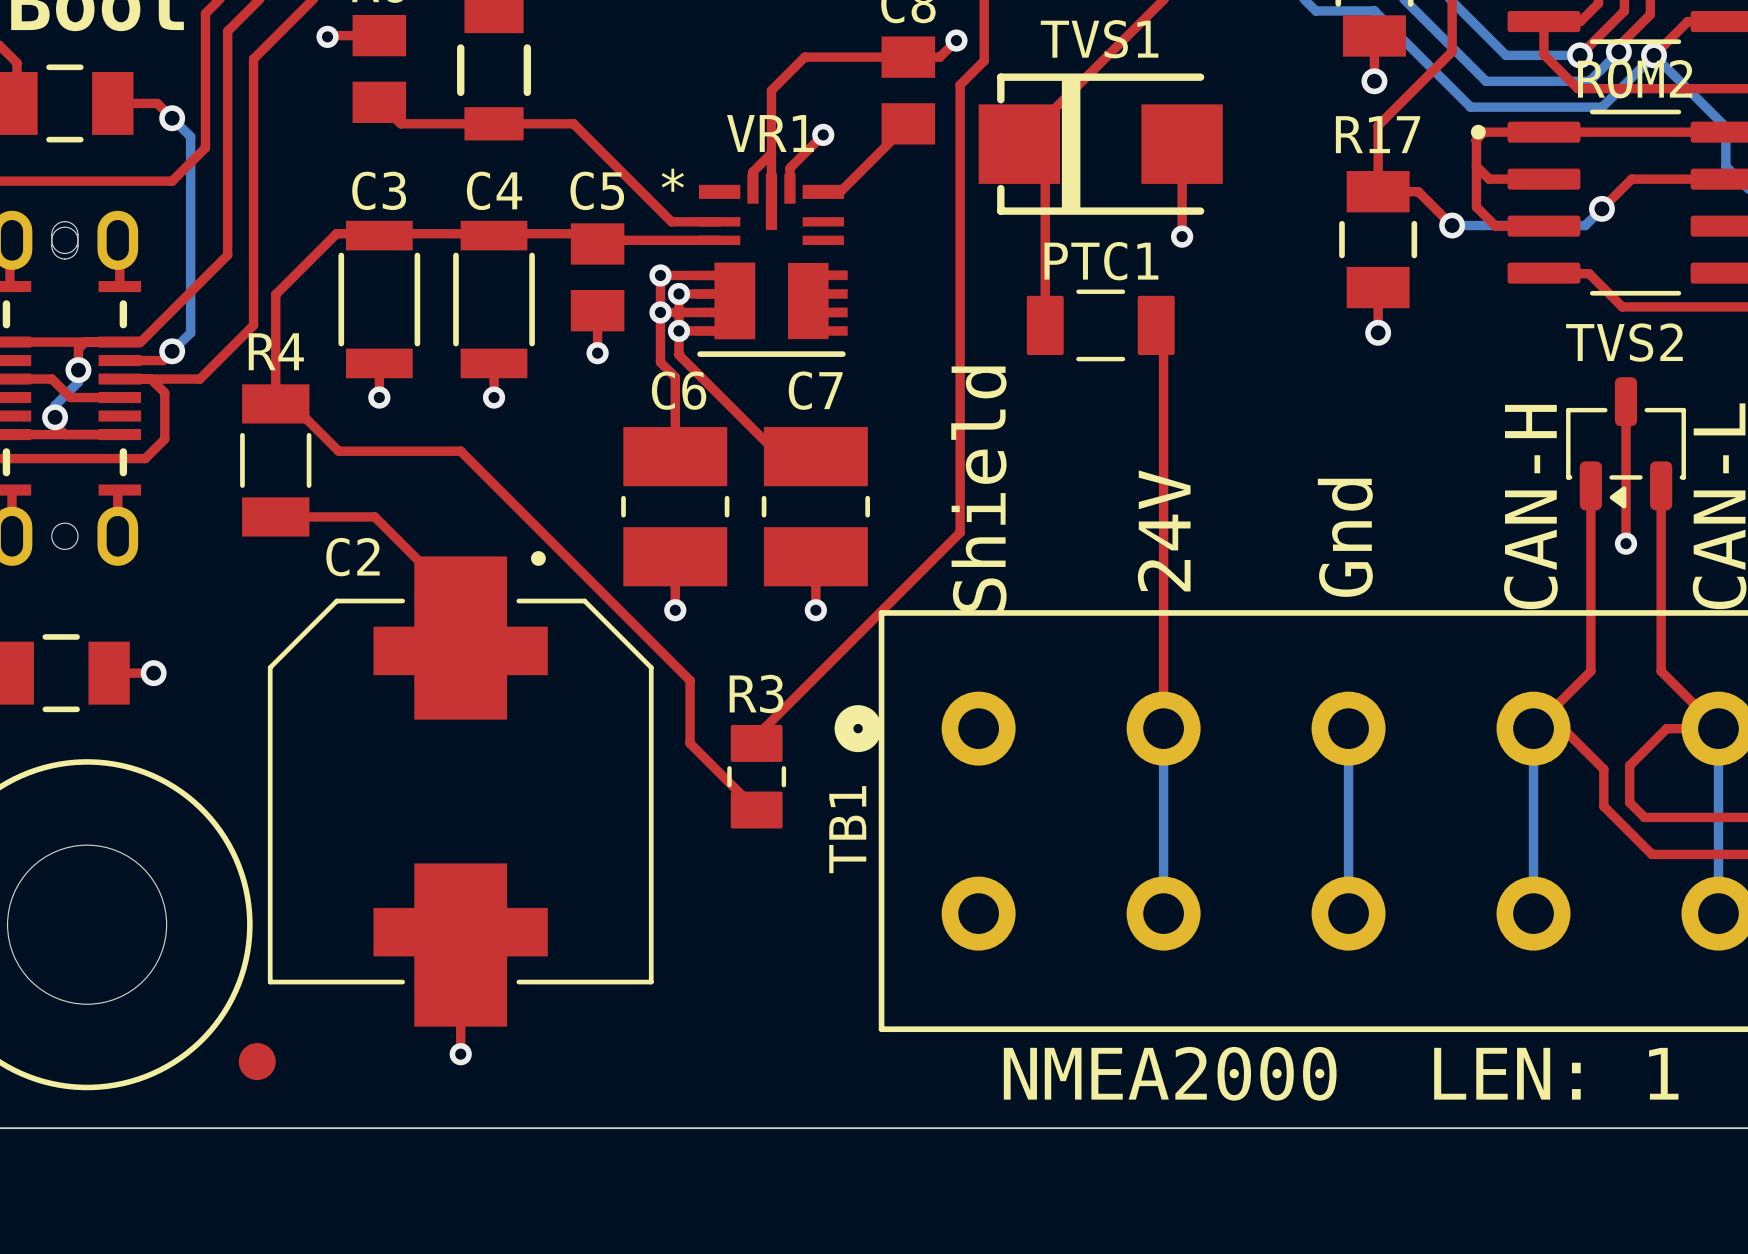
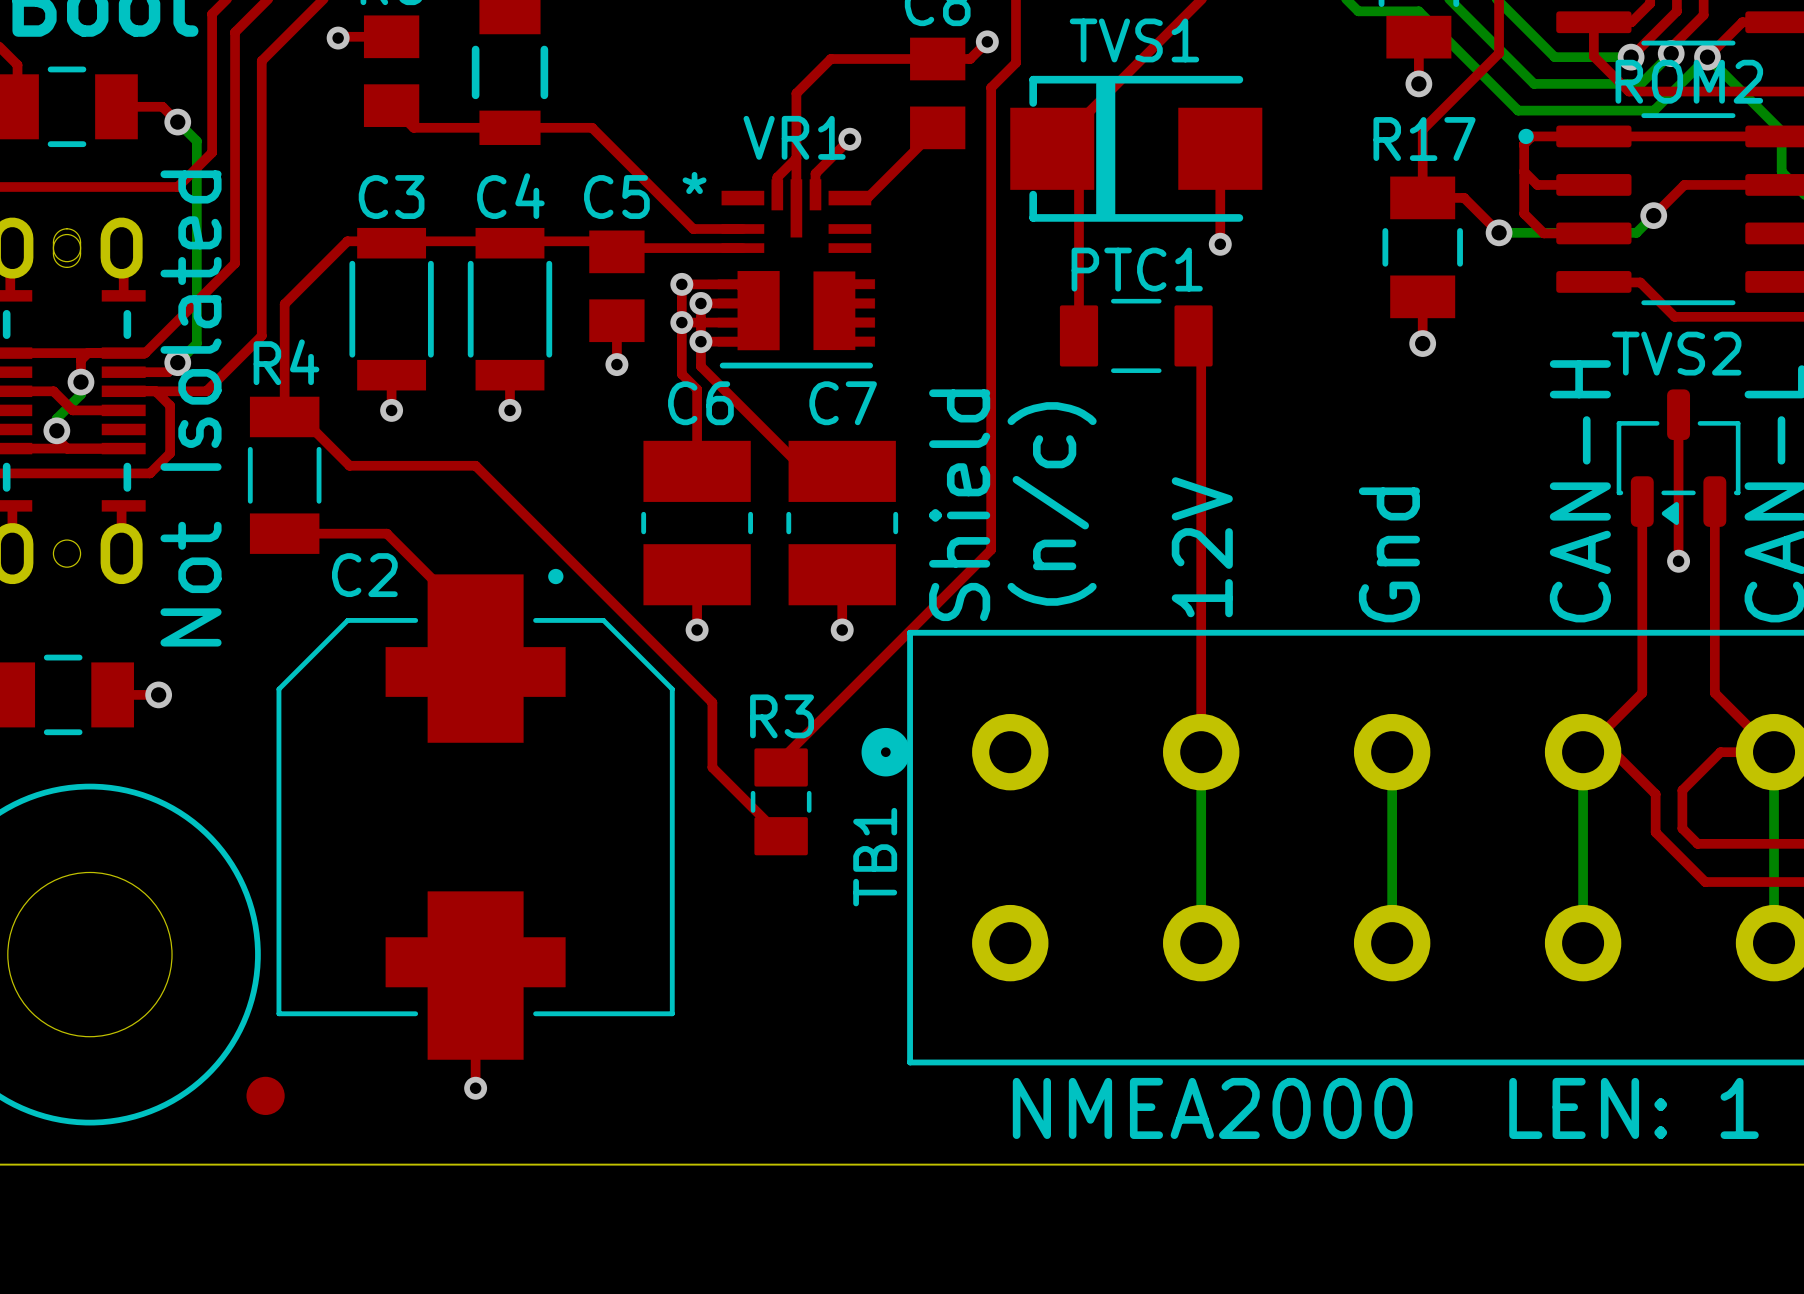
text: none -> Not Isolated (191, 408)
text: none -> (n/c) (1052, 503)
text position: Shield (978, 489) -> Shield (959, 505)
text: 24V (1164, 530) -> 12V (1202, 547)

